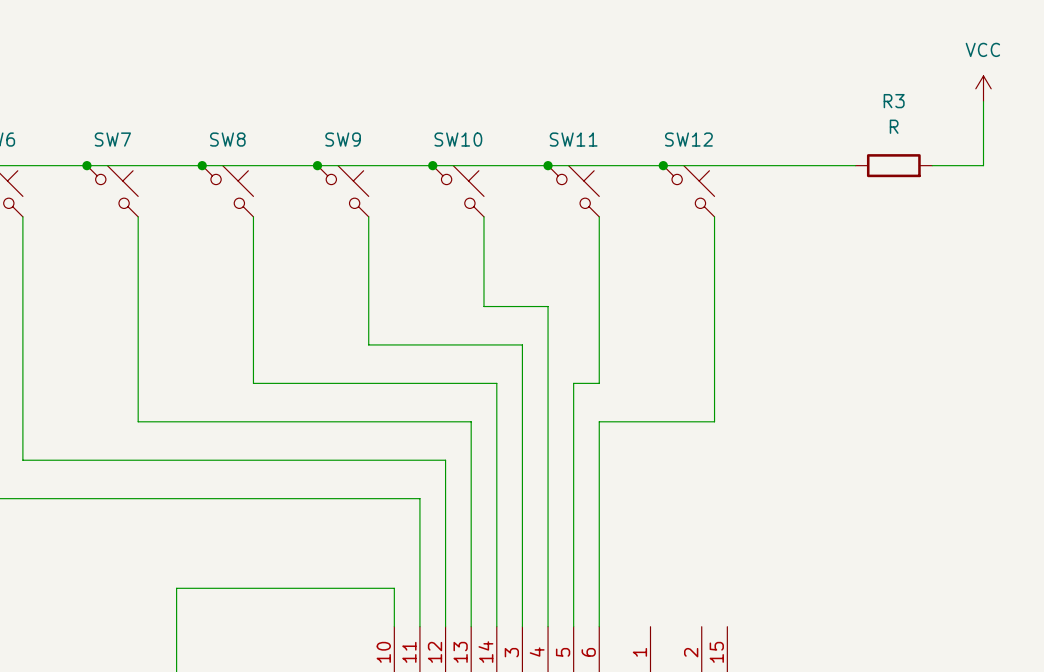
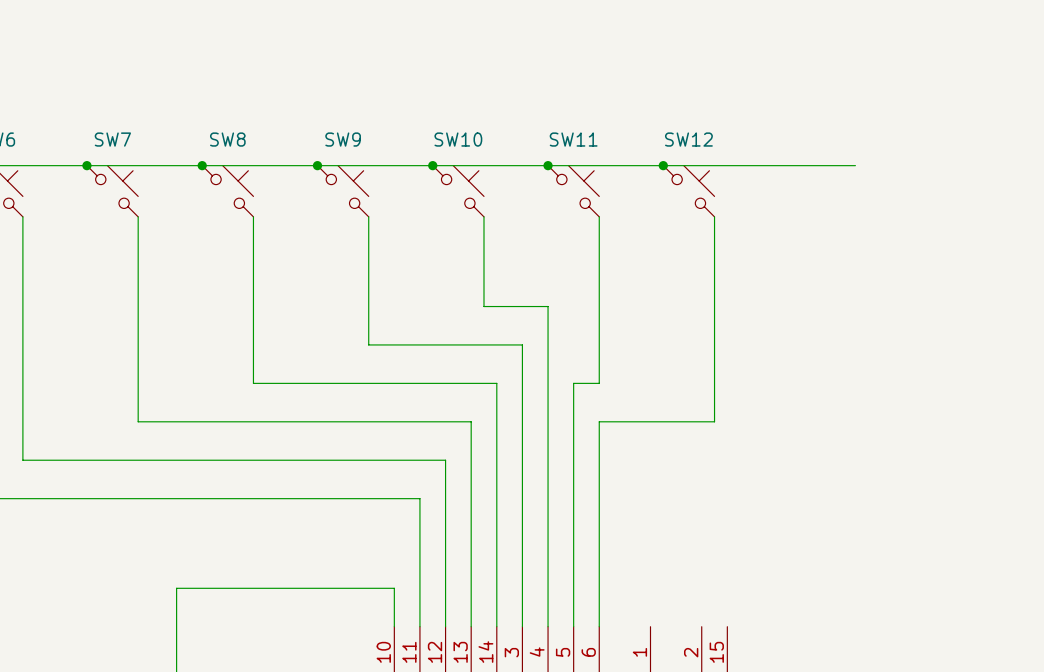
power symbol: VCC (983, 88) -> none
wire: (983, 101) (983, 165) (932, 165) -> none
R3: R (893, 165) -> none

